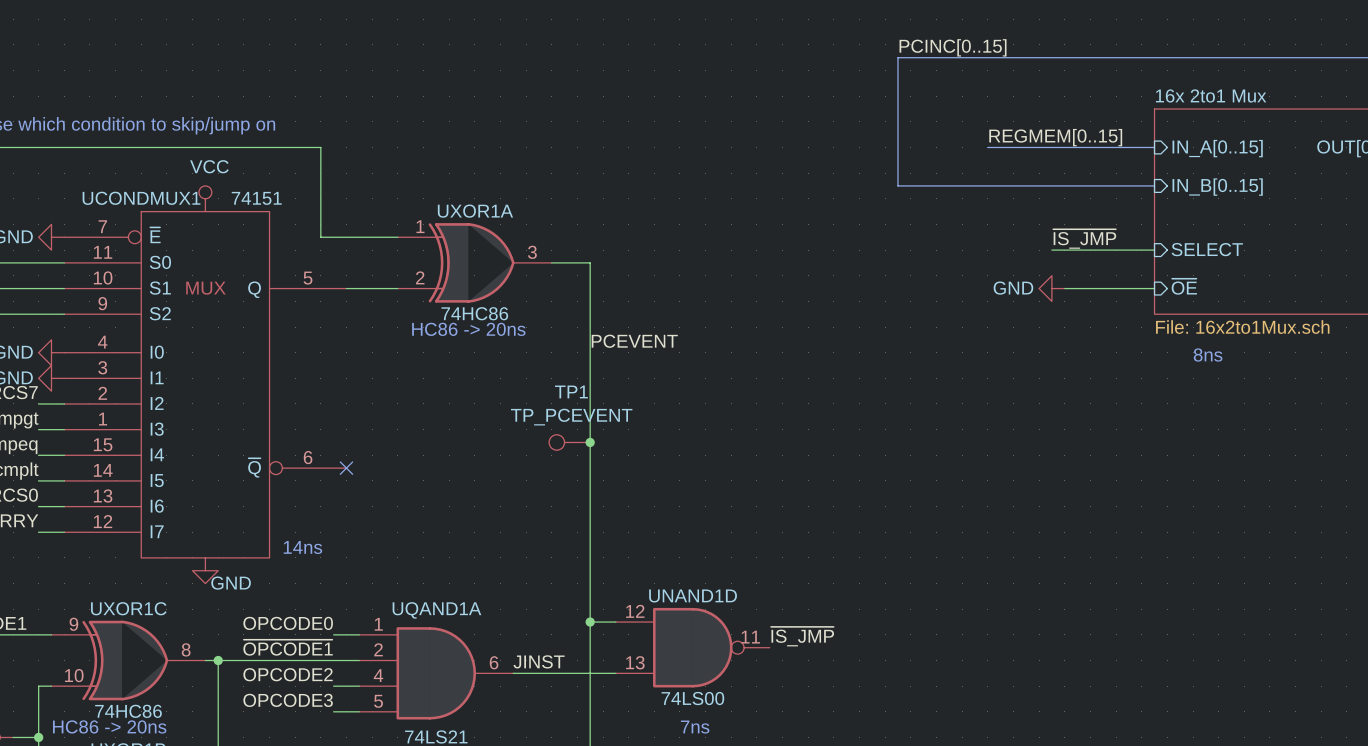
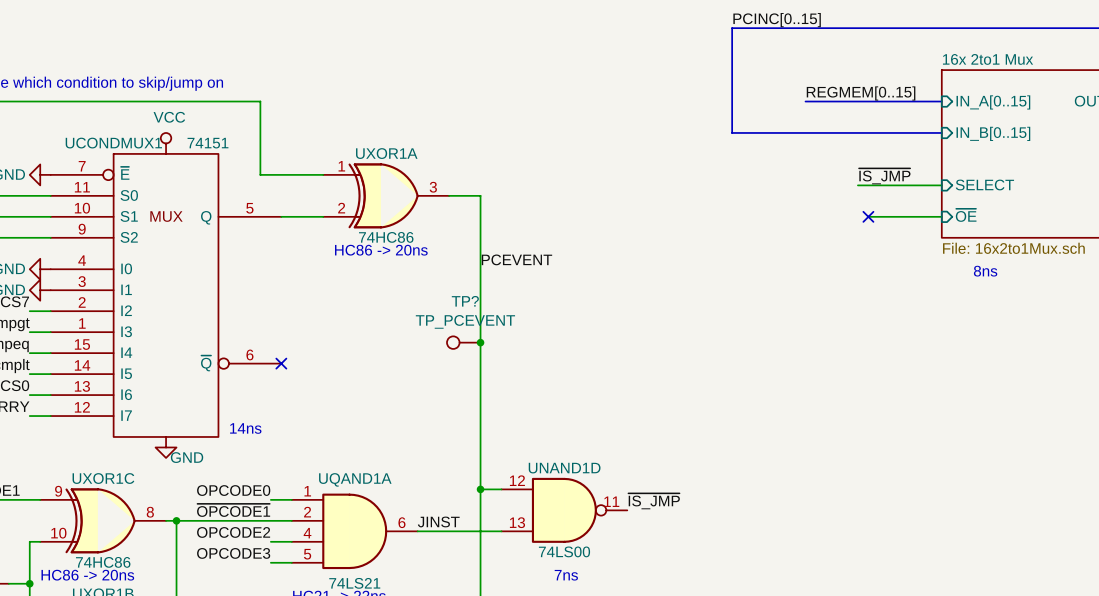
power symbol: GND (1051, 288) -> none
no-connect mark: none -> (868, 216)
TP1 name: TP1 (571, 391) -> TP? (465, 301)

